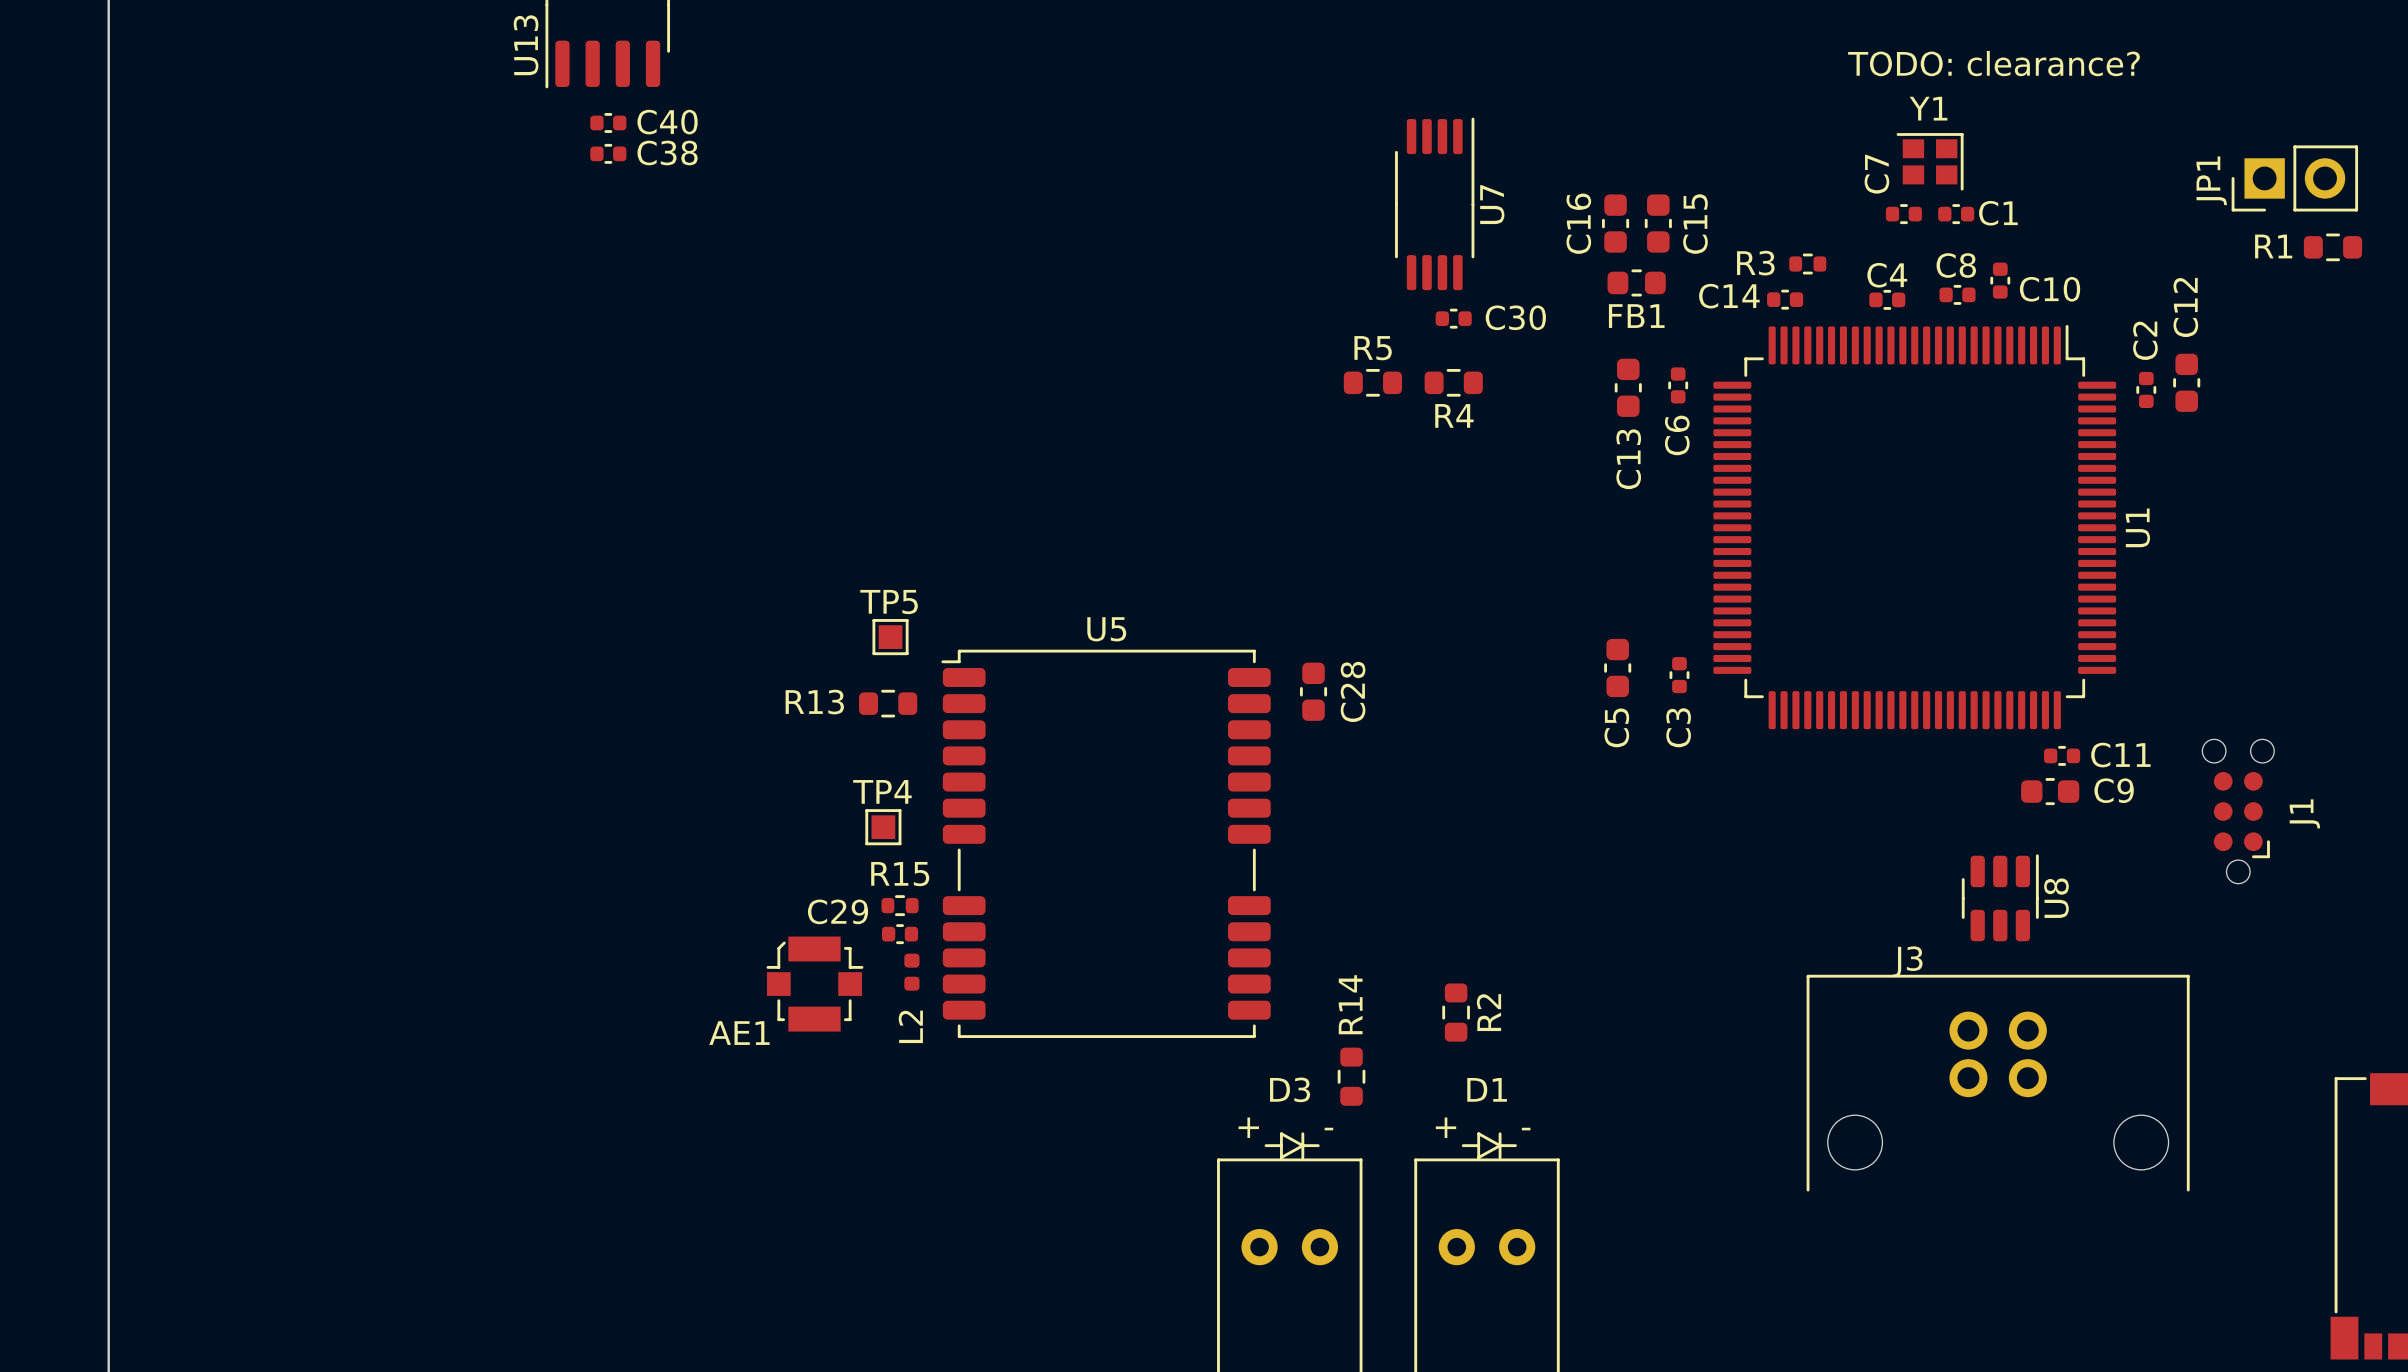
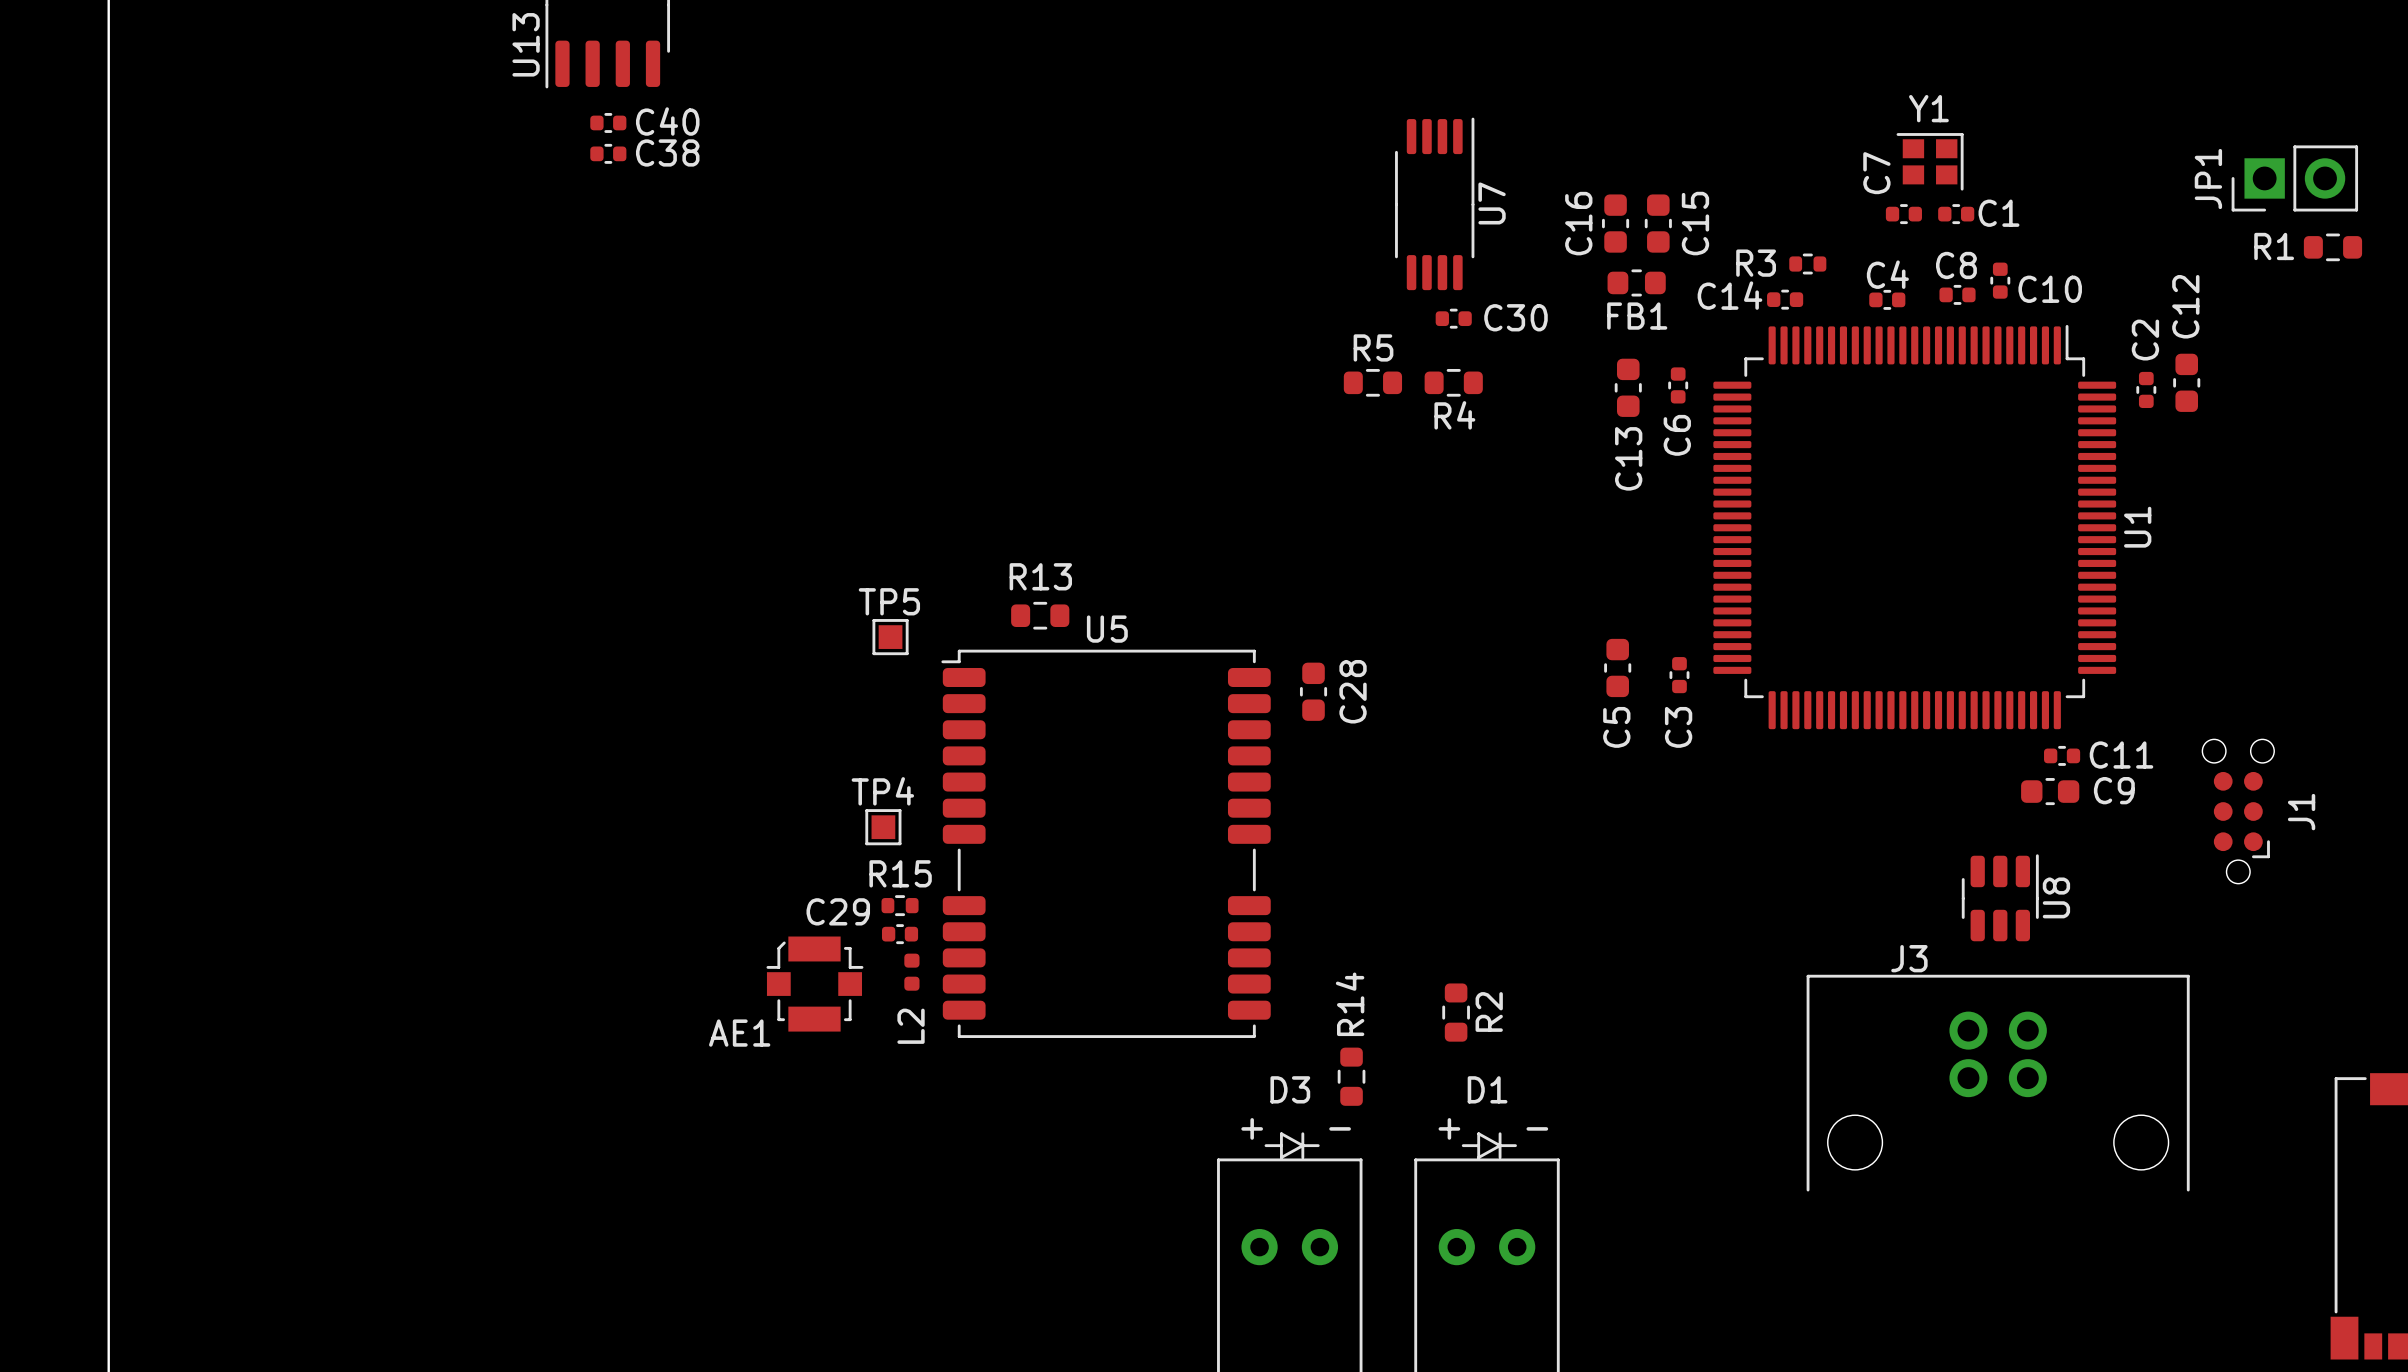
text: TODO: clearance? (1994, 63) -> none
R13 name position: R13 (814, 702) -> R13 (1040, 576)
R13 position: (888, 703) -> (1040, 615)

